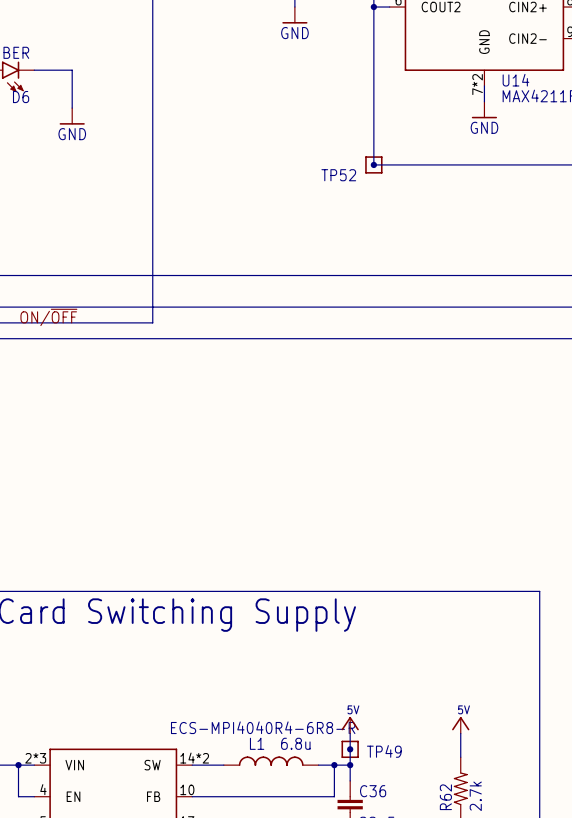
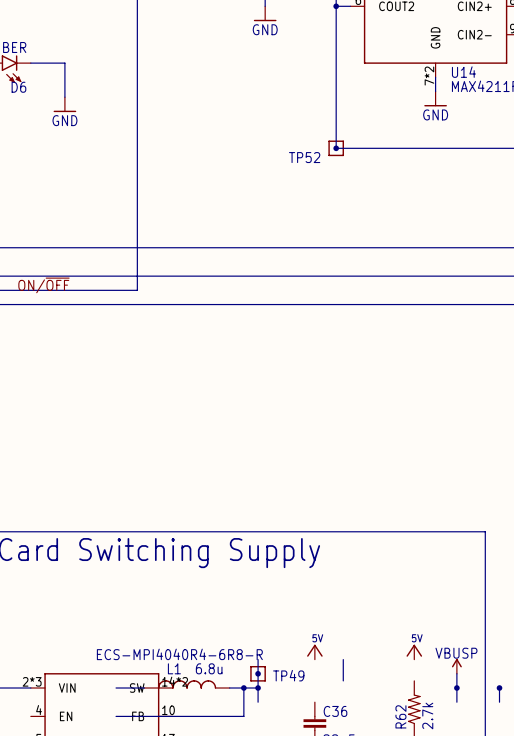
text position: ECS-MPI4040R4-6R8-R (263, 727) -> ECS-MPI4040R4-6R8-R (179, 654)
wire: (350, 733) (350, 780) -> (258, 659) (258, 702)
wire: (460, 733) (460, 757) -> (343, 659) (343, 680)
power symbol: none -> VBUSP (456, 666)
junction: none -> (258, 673)
TP49 position: (350, 749) -> (258, 673)
junction: (350, 749) -> none
wire: none -> (456, 673) (456, 702)
L1 position: (271, 761) -> (187, 684)
wire: (18, 765) (18, 796) (34, 796) -> none
junction: (18, 765) -> none
wire: (192, 765) (223, 765) -> (116, 688) (144, 688)
junction: none -> (243, 688)
junction: none -> (258, 688)
wire: (318, 765) (350, 765) -> (229, 688) (258, 688)
wire: (334, 765) (334, 796) (271, 796) -> (243, 688) (243, 716)
junction: (334, 765) -> none
junction: (350, 765) -> none
junction: none -> (456, 688)
wire: none -> (499, 688) (499, 702)
junction: none -> (499, 688)
wire: none -> (116, 716) (172, 716)

